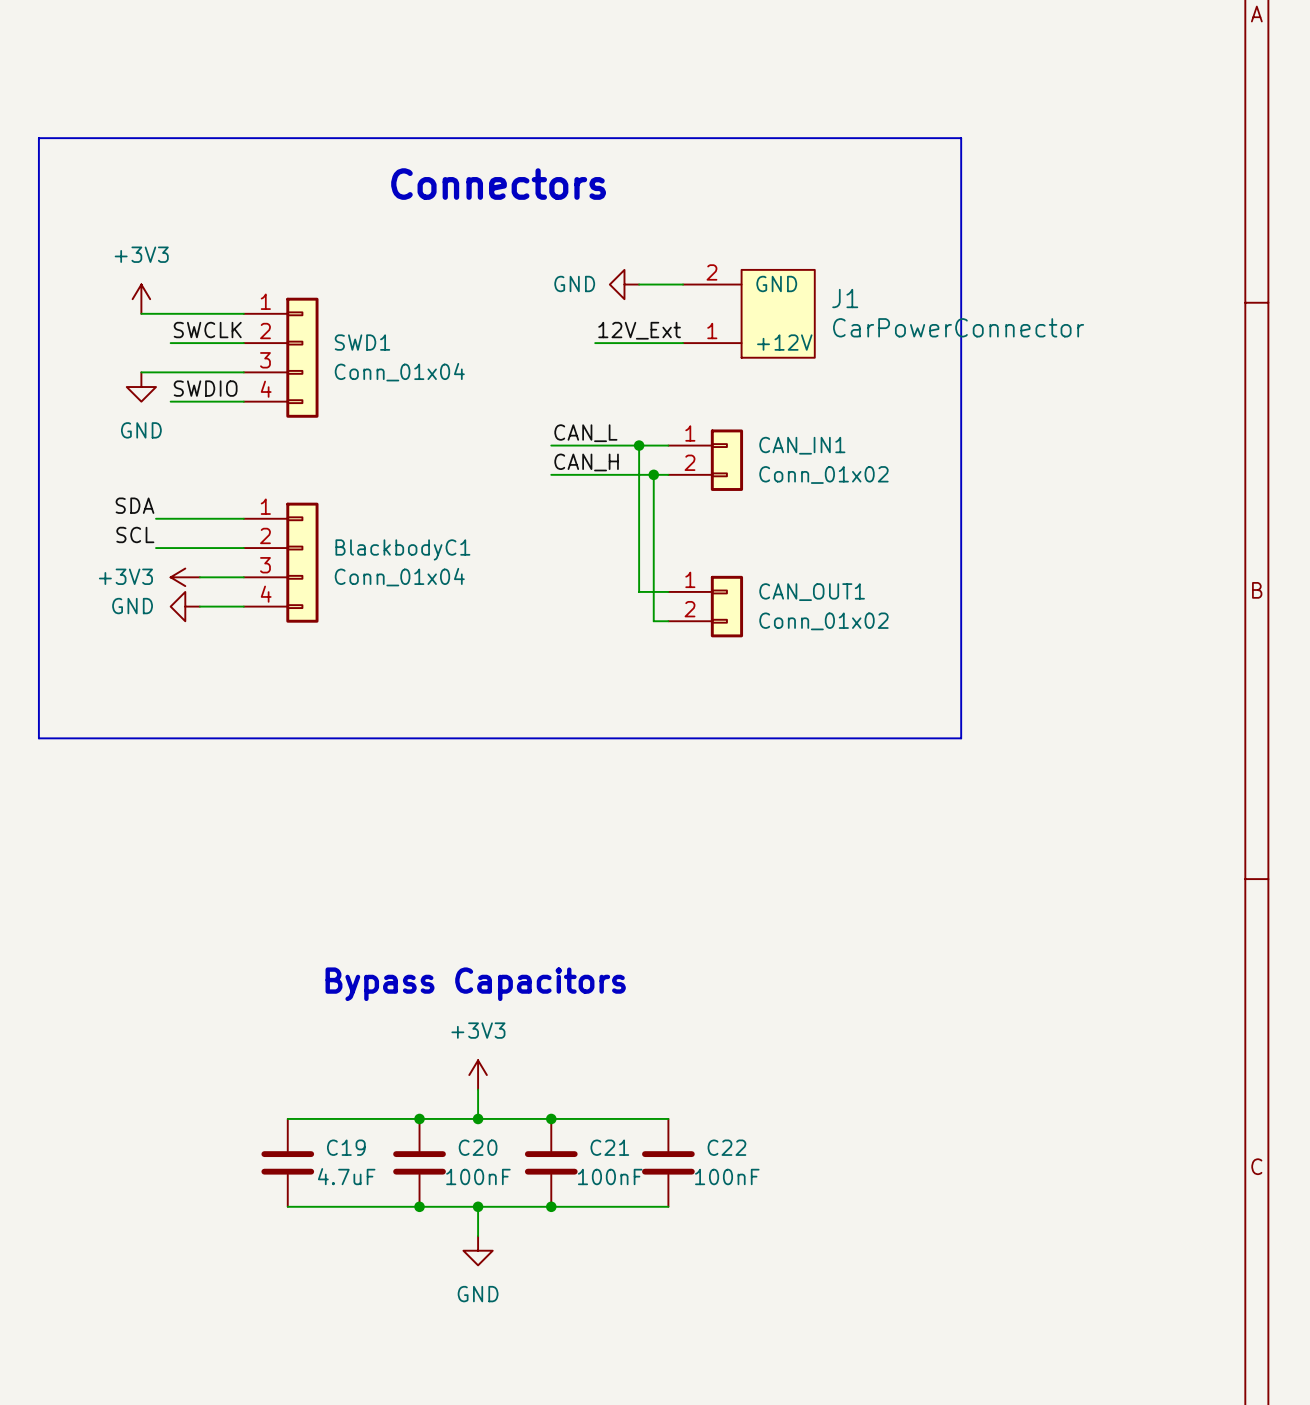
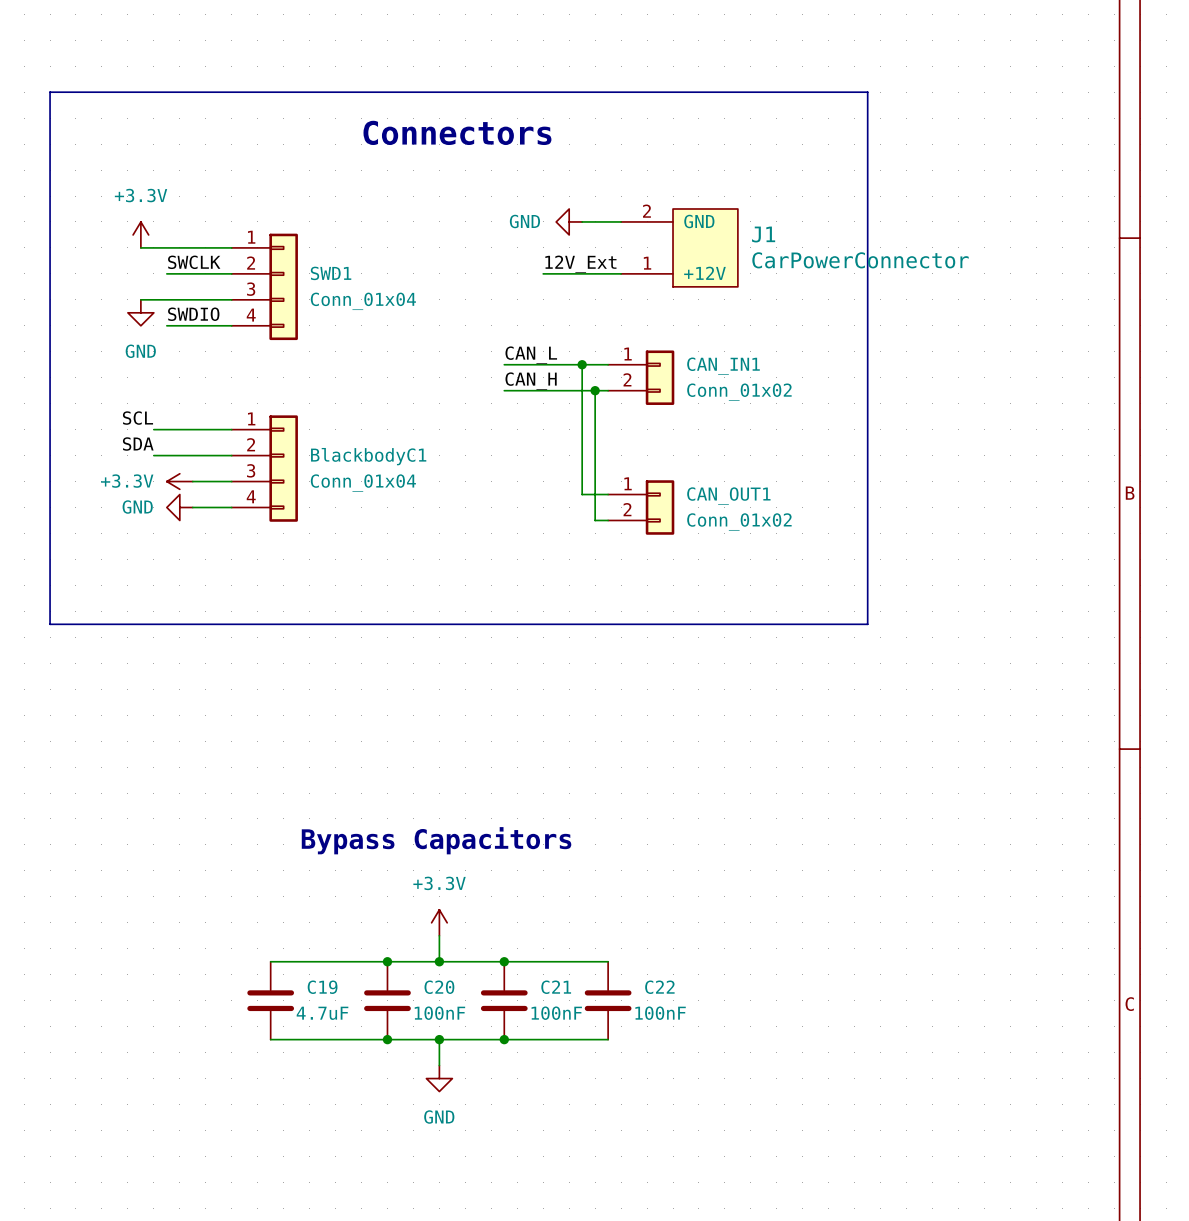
power symbol: +3V3 (141, 299) -> +3.3V (140, 234)
label: SDA (135, 505) -> SCL (137, 418)
label: SCL (135, 534) -> SDA (138, 444)
power symbol: +3V3 (185, 577) -> +3.3V (179, 481)
power symbol: +3V3 (478, 1075) -> +3.3V (439, 922)

